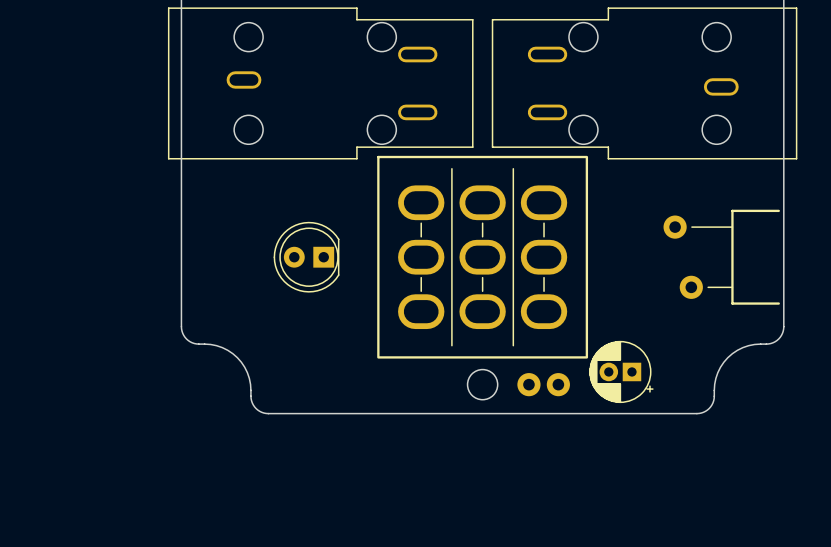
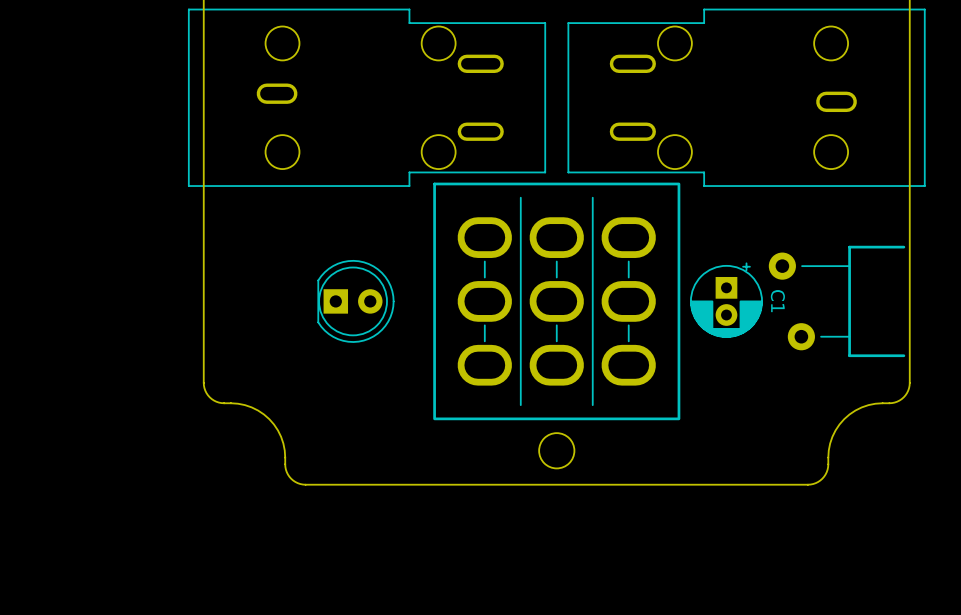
C1: none -> (726, 300)
part rotation: 0° (306, 257) -> 180° (355, 301)
part: (621, 371) -> none
part: (543, 384) -> none

